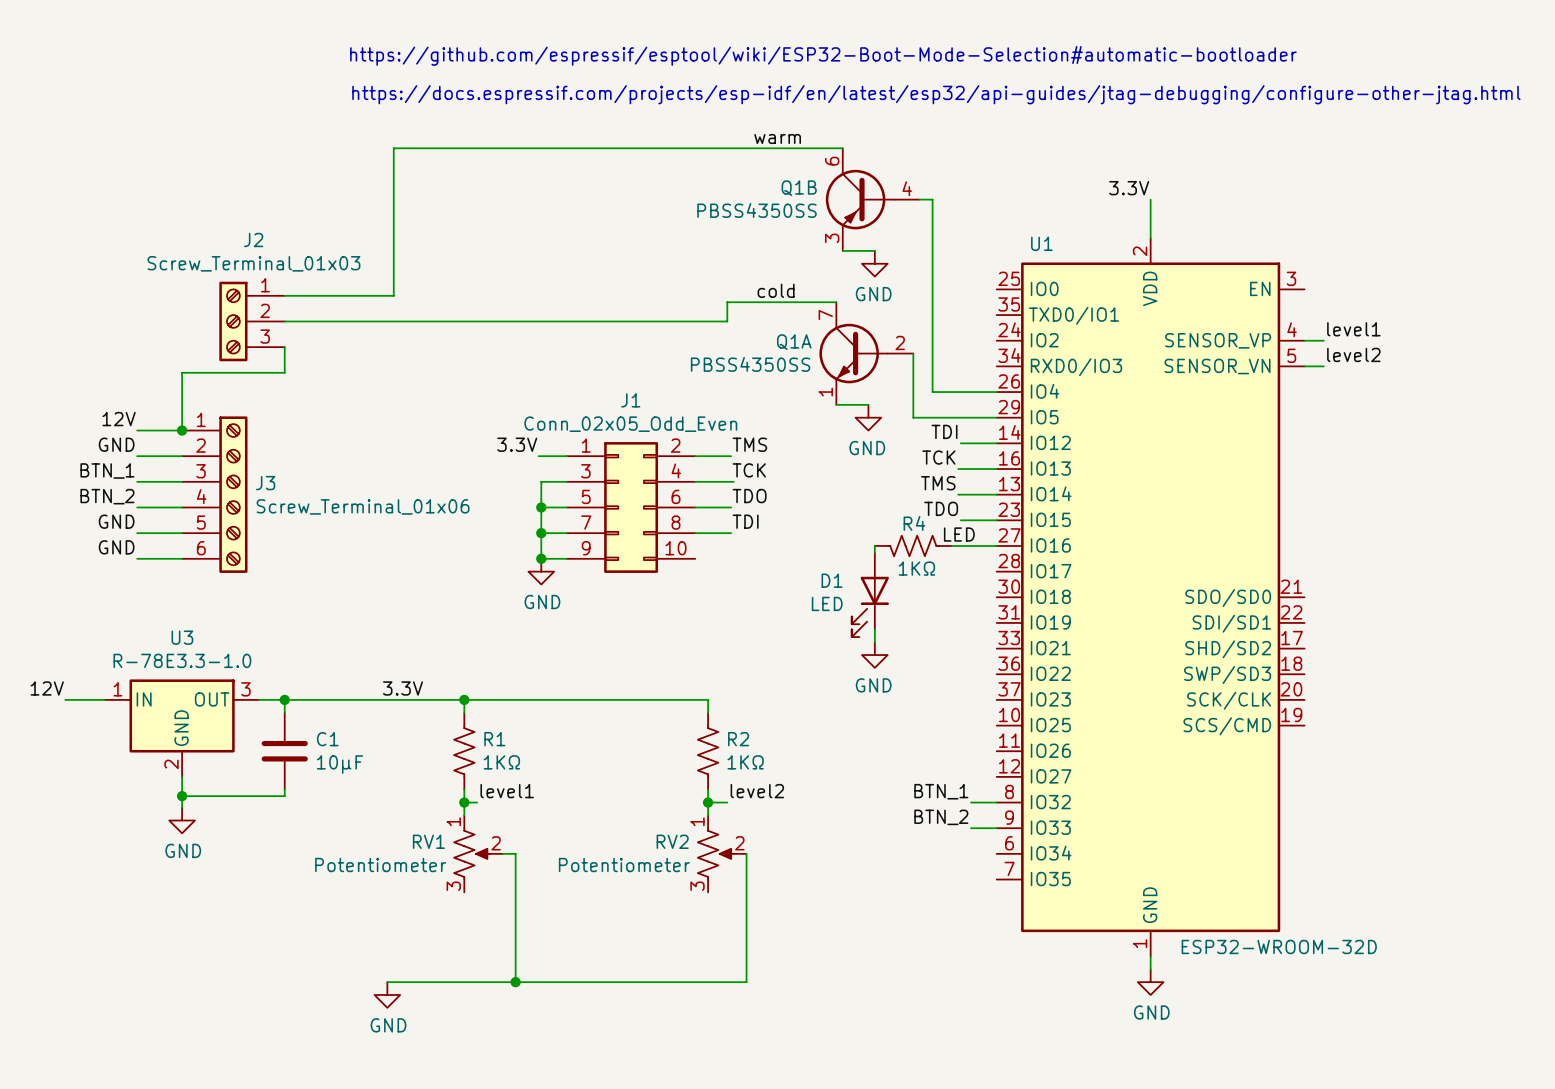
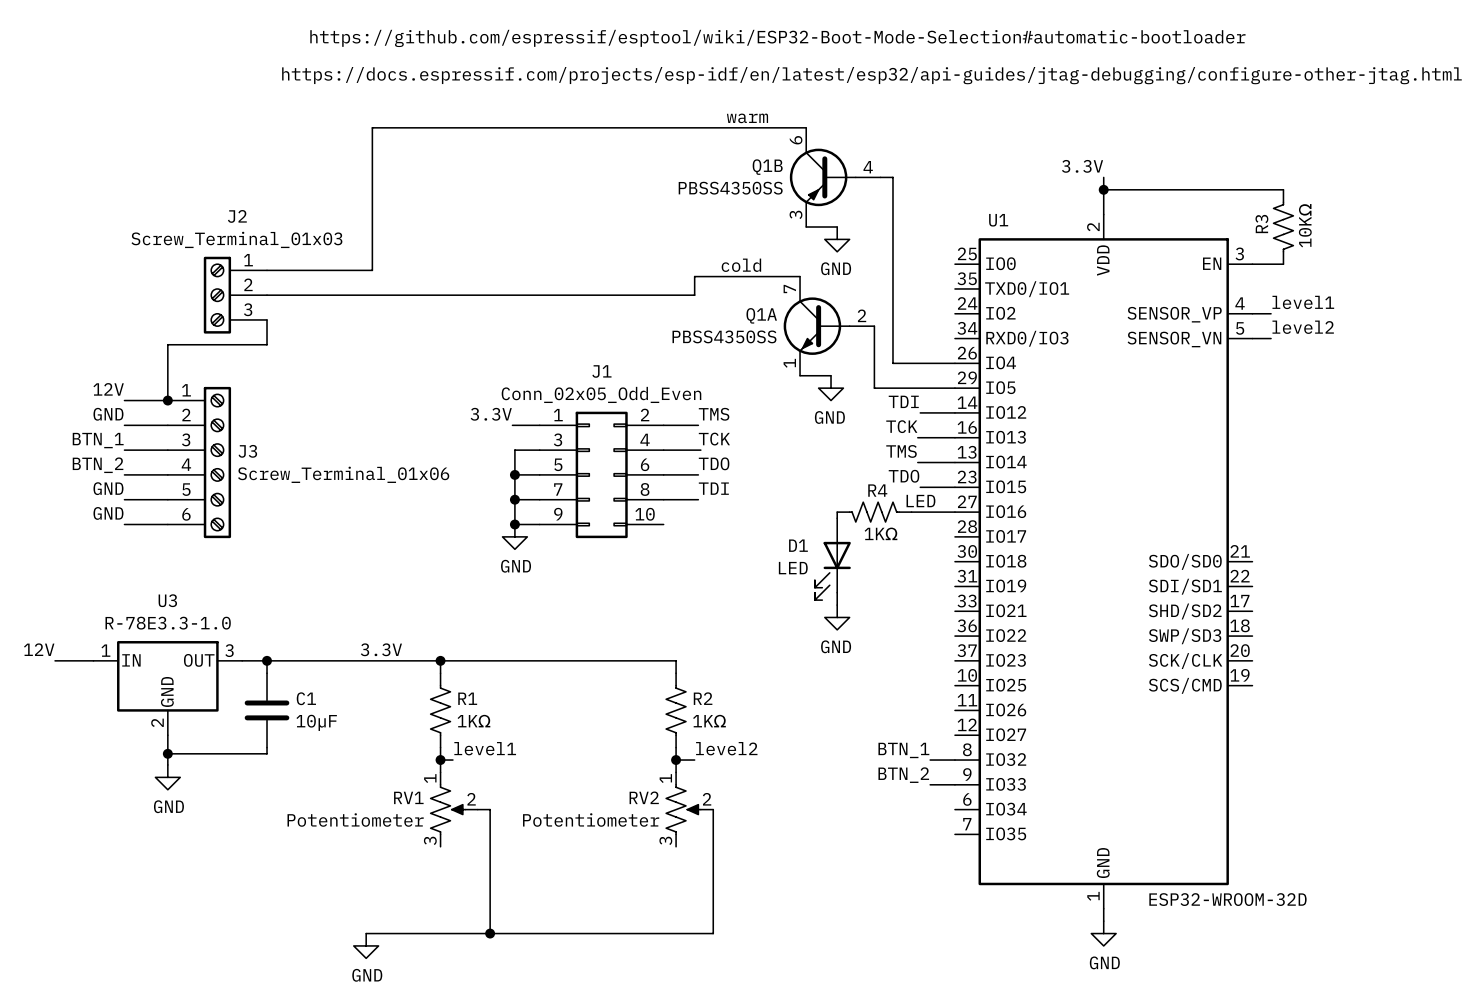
wire: none -> (1103, 189) (1283, 189)
junction: none -> (1103, 189)
R3: none -> 10KΩ (1283, 227)
wire: none -> (1252, 264) (1283, 264)

